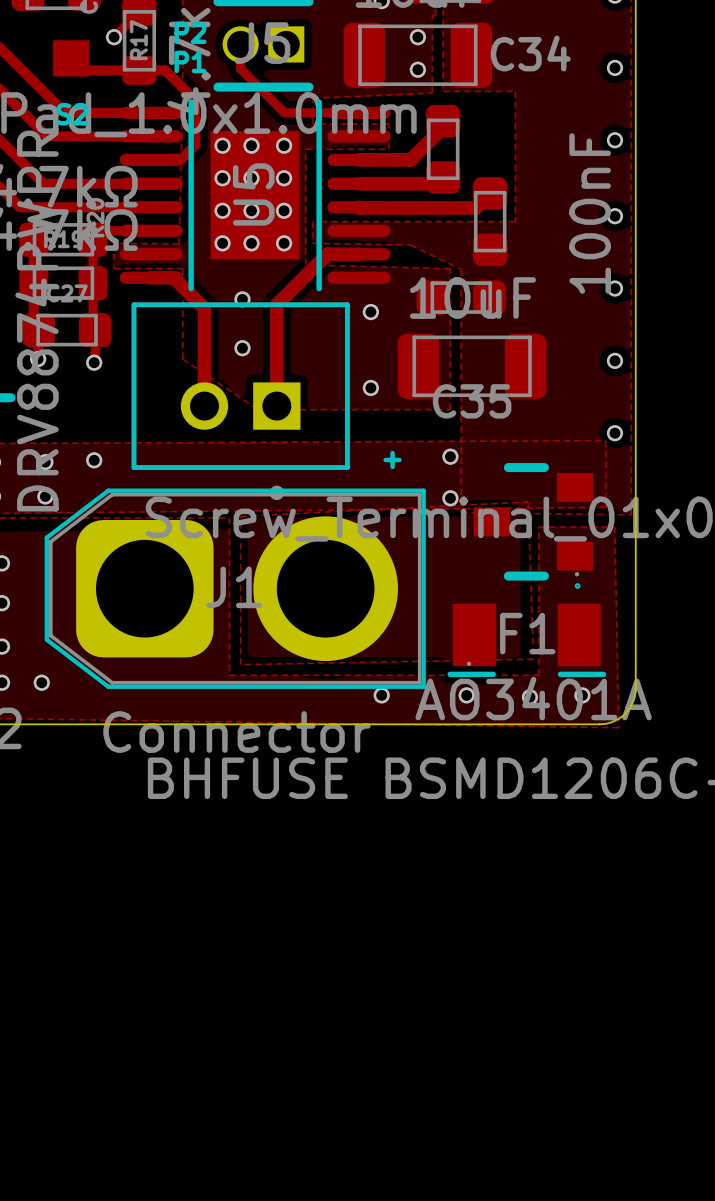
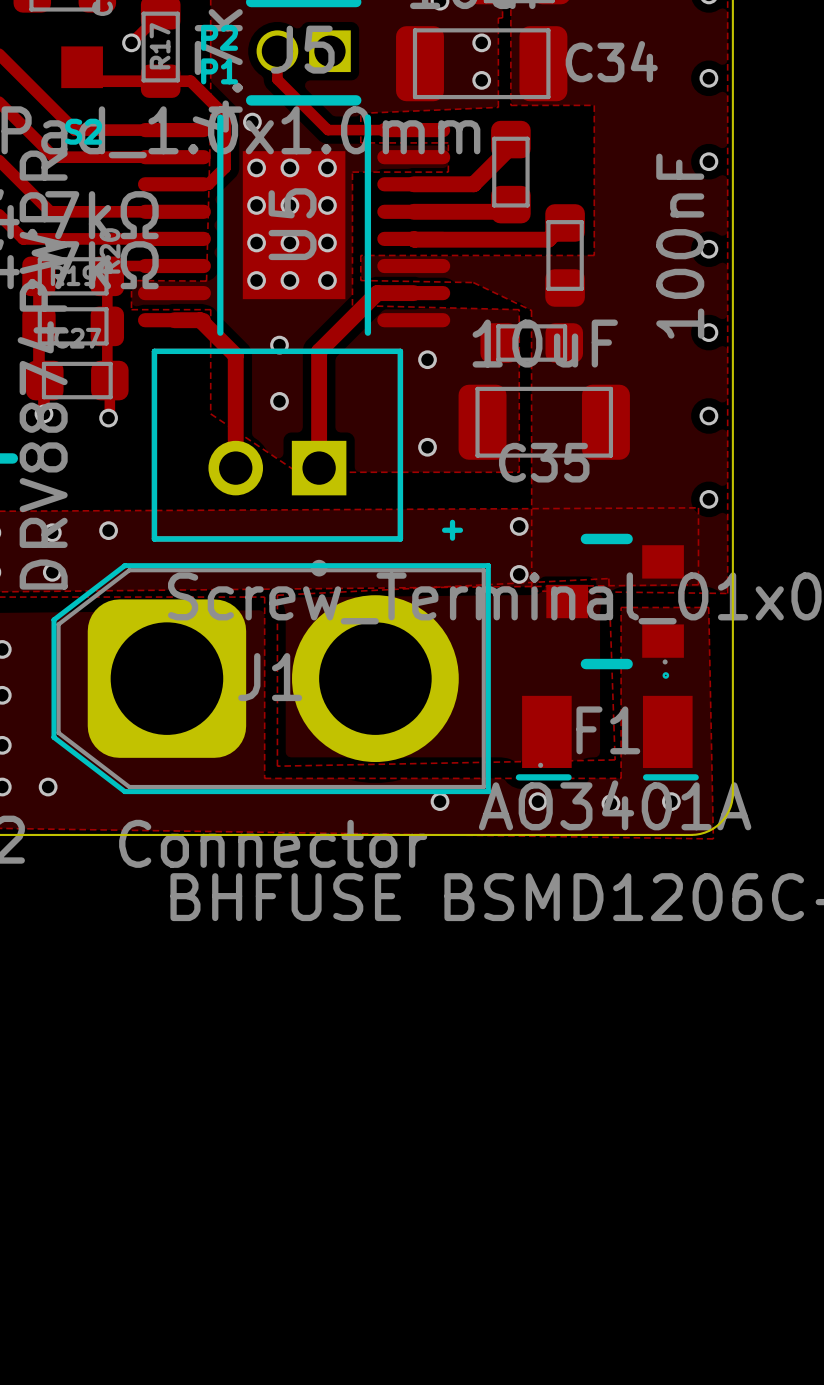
via: none -> (252, 122)

